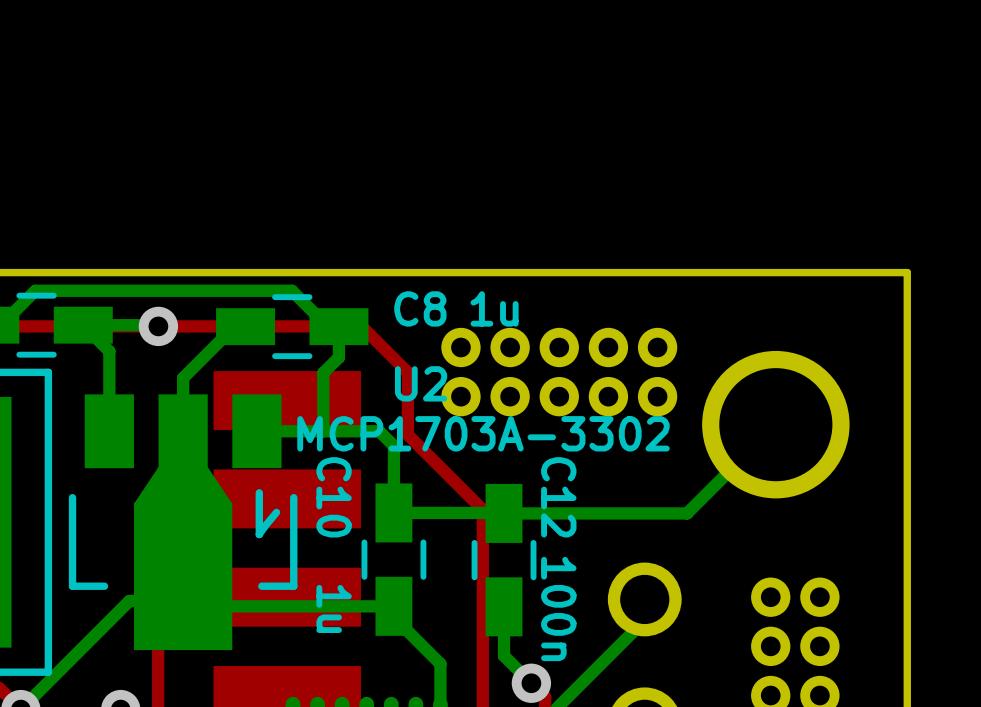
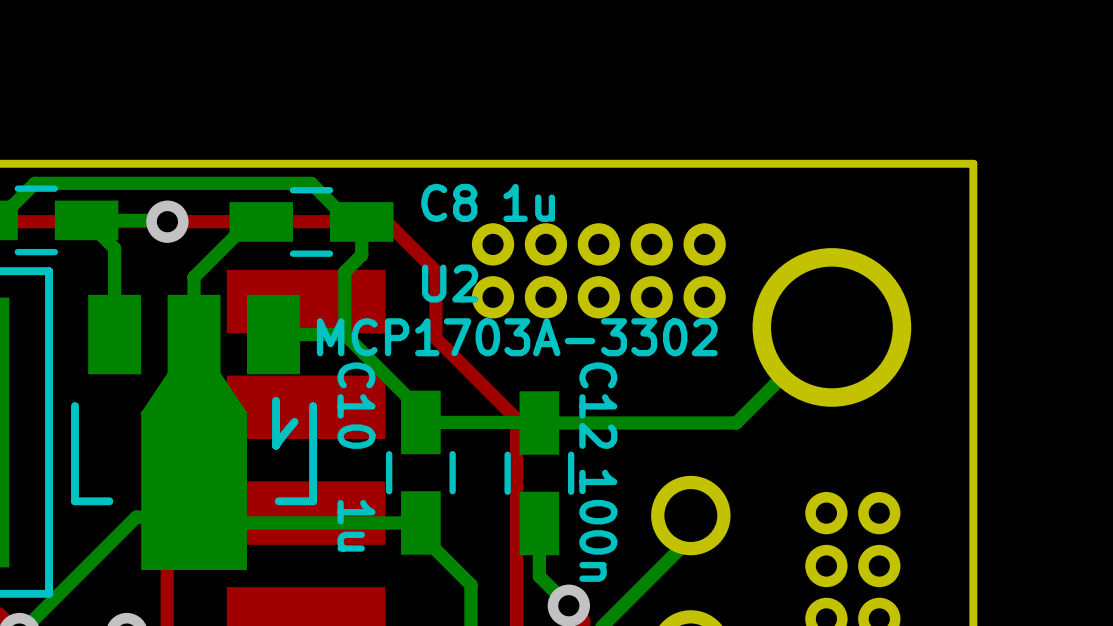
bottom track: (323, 431) (379, 431) (393, 445) (393, 501) -> (344, 334) (420, 410)

